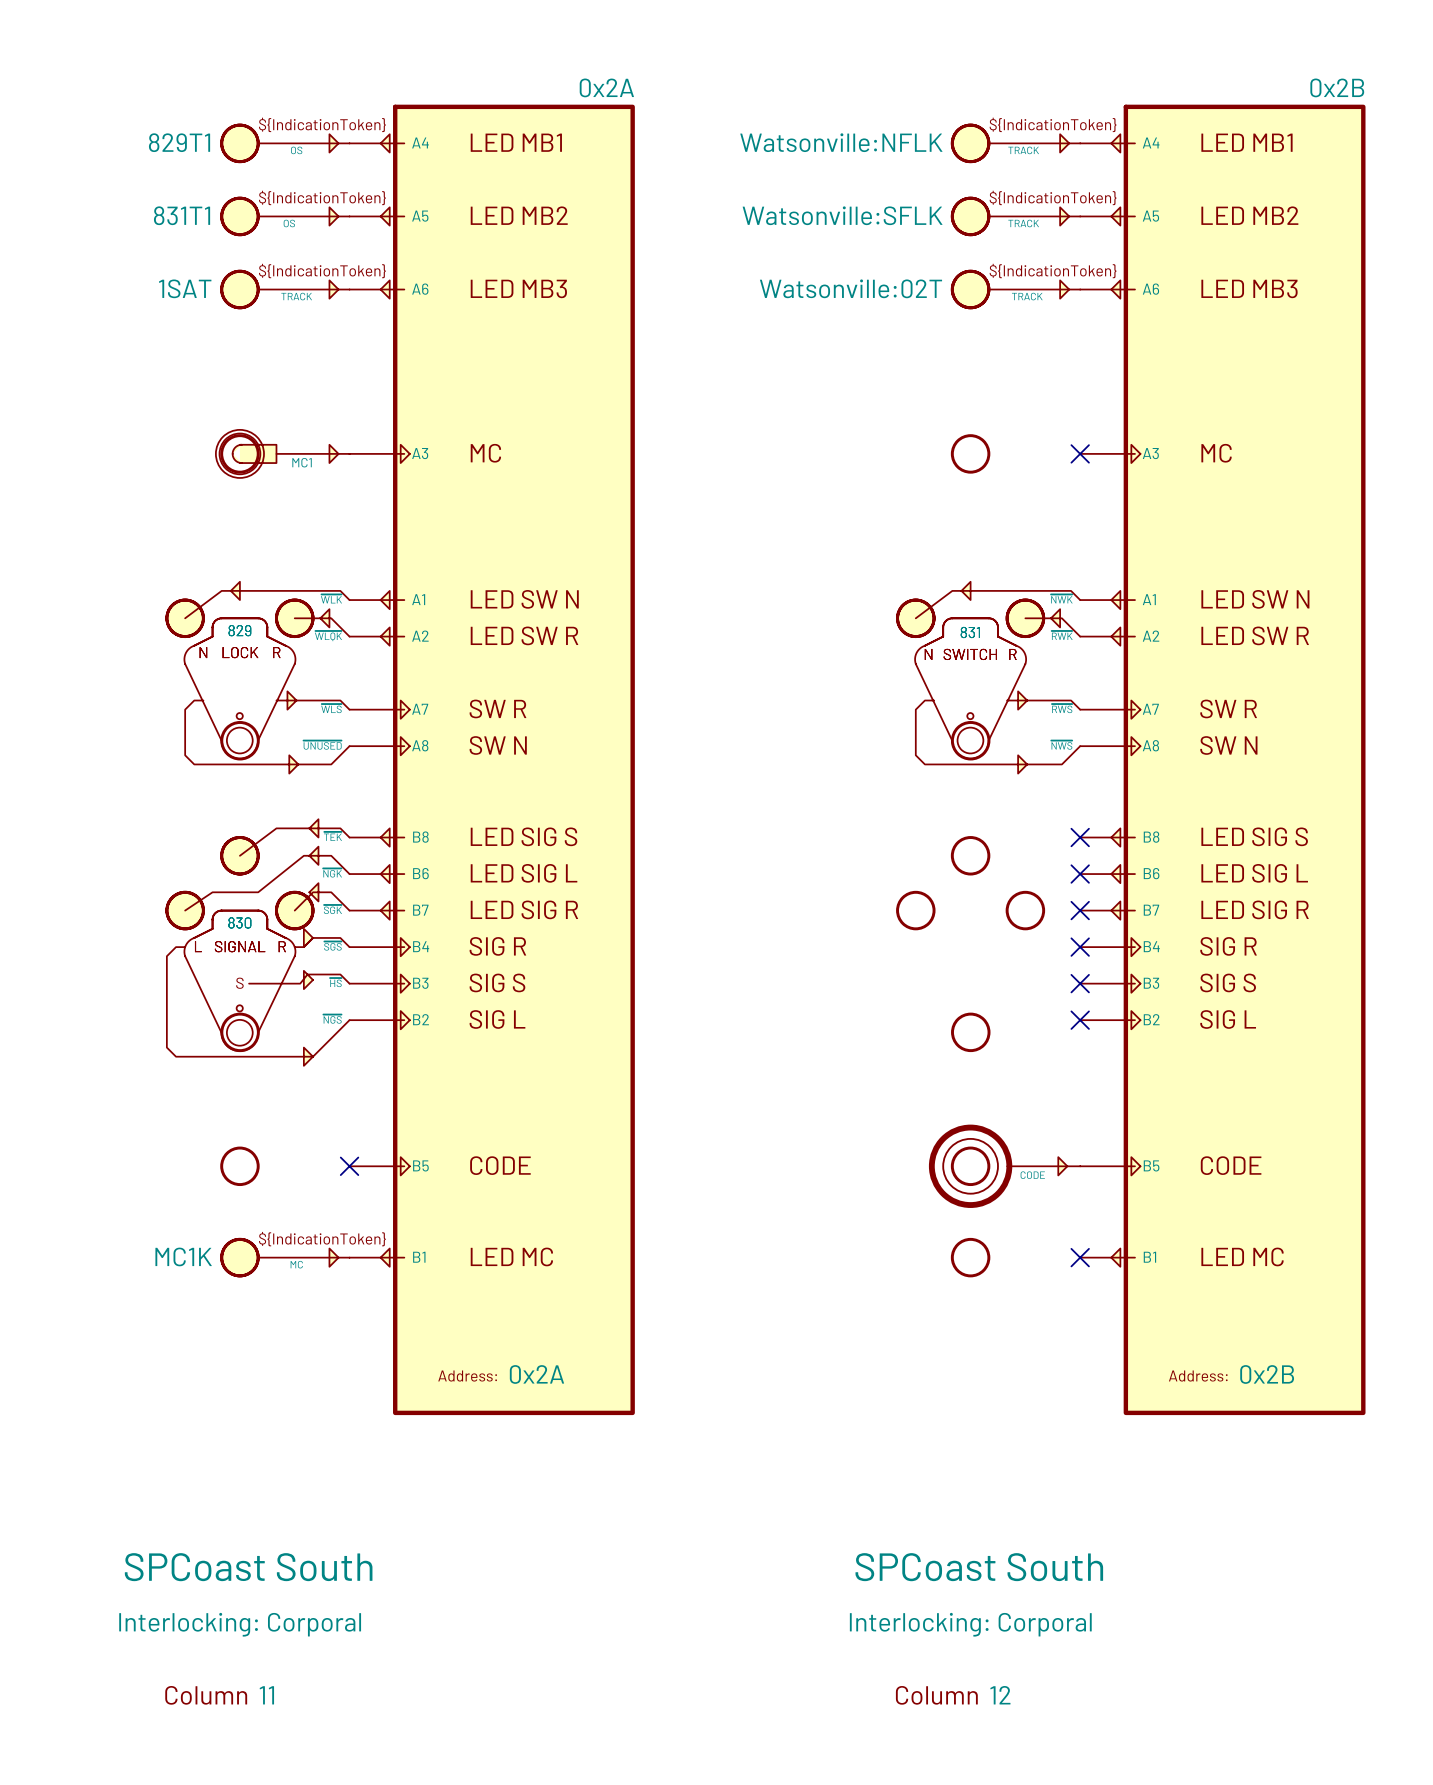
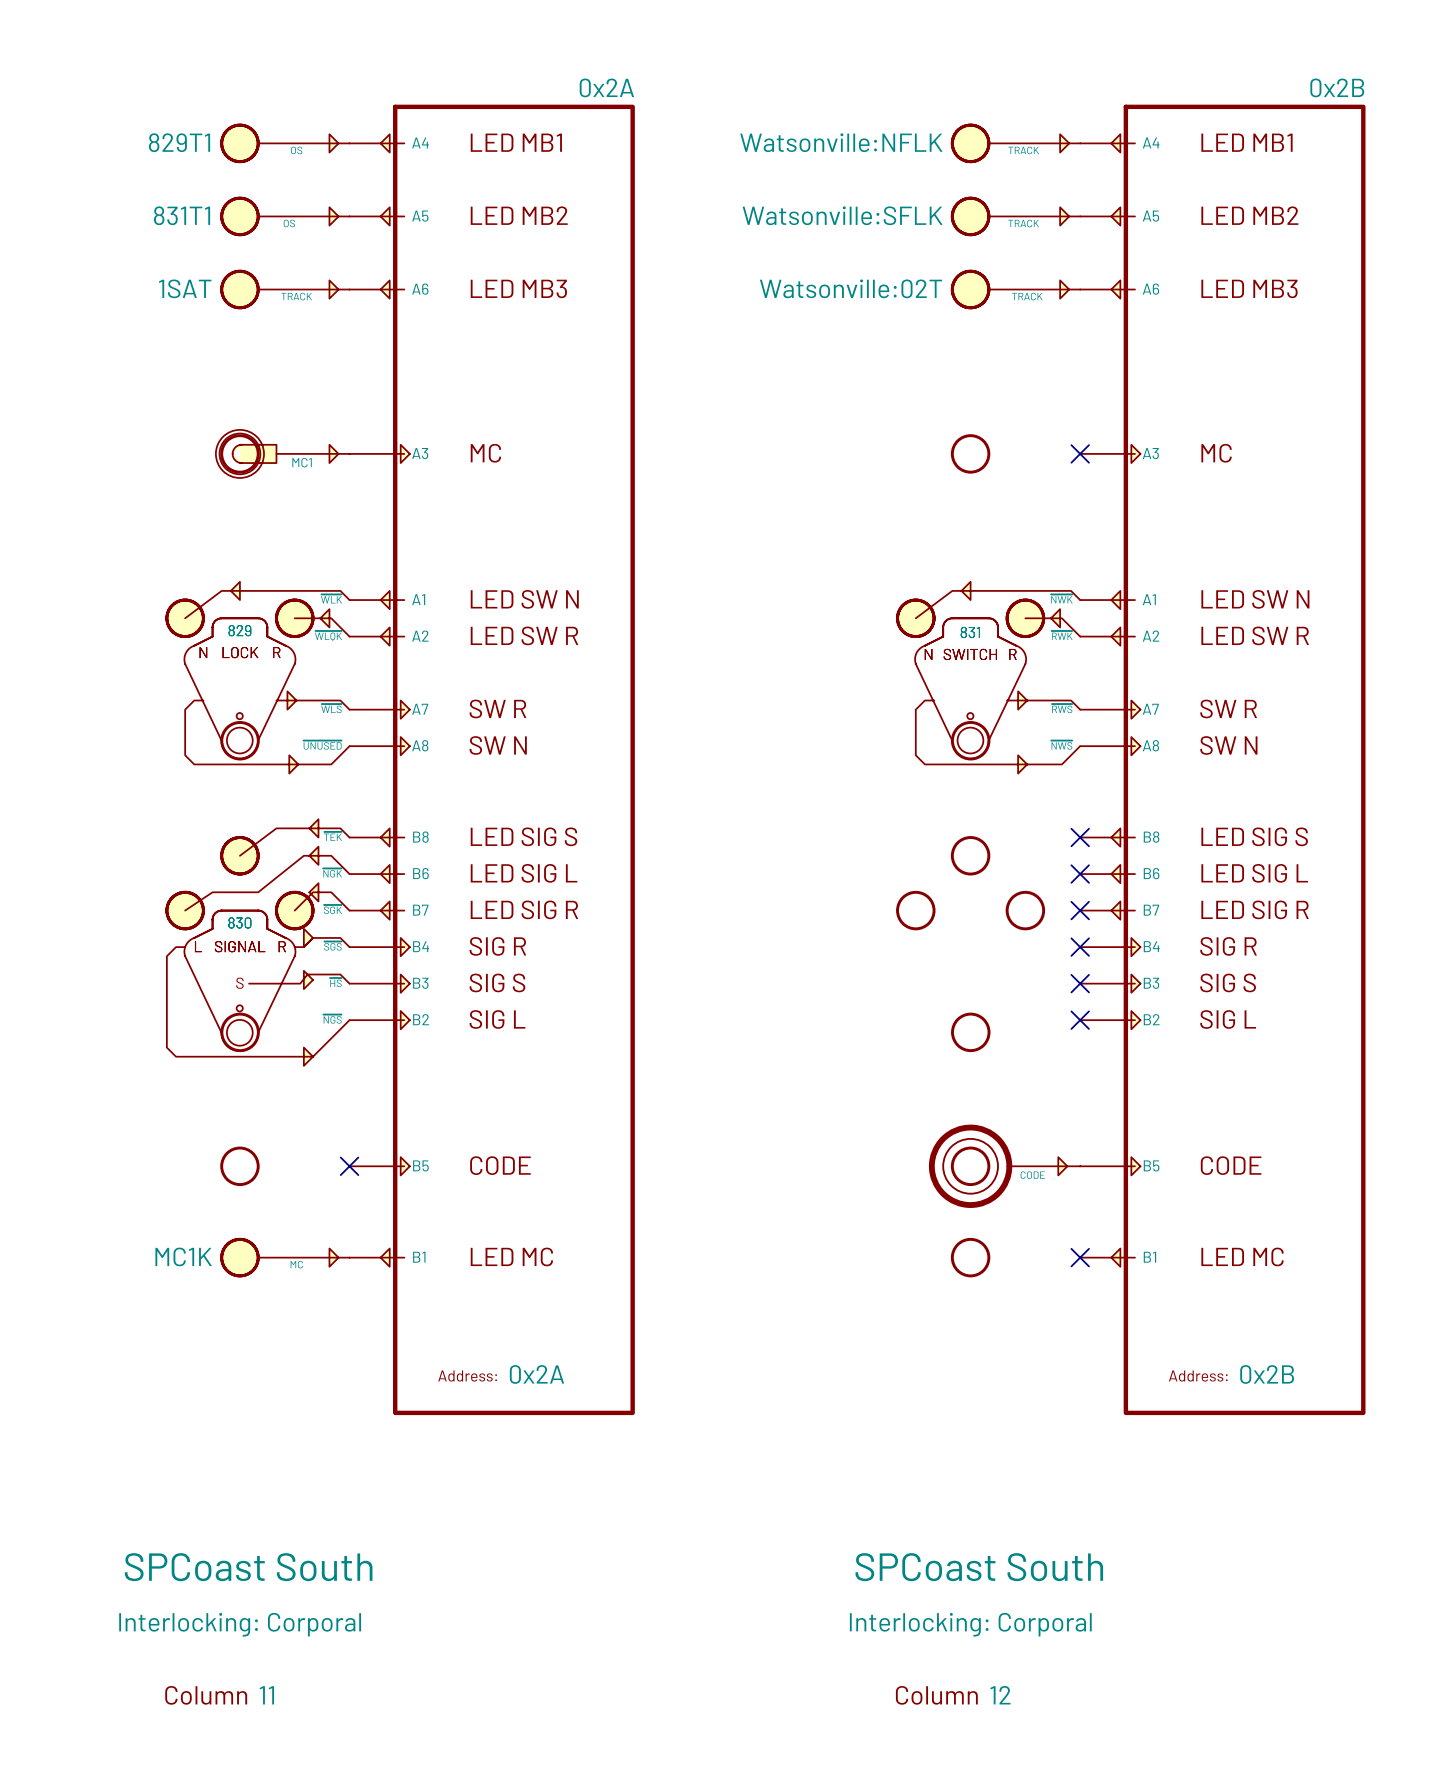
part symbol: [349, 104, 635, 1416] -> [349, 104, 635, 1416]
part symbol: [1080, 104, 1366, 1416] -> [1080, 104, 1366, 1416]
part text: ${IndicationToken} (322, 124) -> none
part text: ${IndicationToken} (1053, 124) -> none
part text: ${IndicationToken} (322, 197) -> none
part text: ${IndicationToken} (1053, 197) -> none
part text: ${IndicationToken} (322, 271) -> none
part text: ${IndicationToken} (1053, 271) -> none
part text: ${IndicationToken} (322, 1239) -> none

